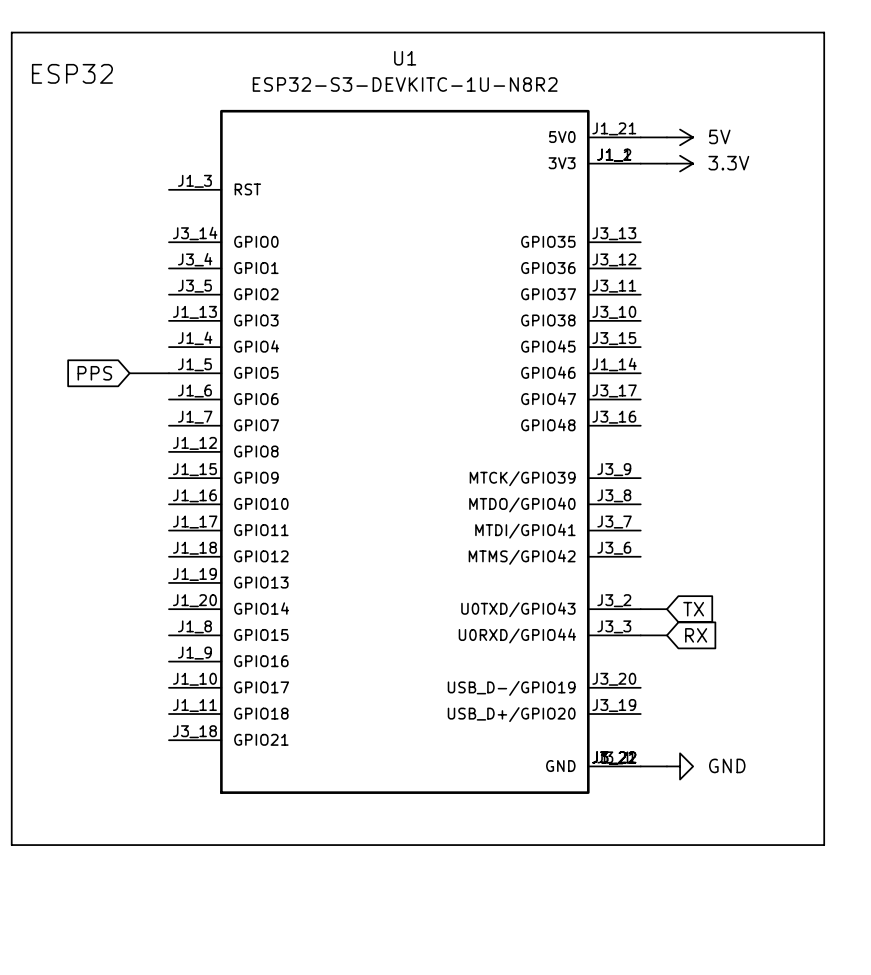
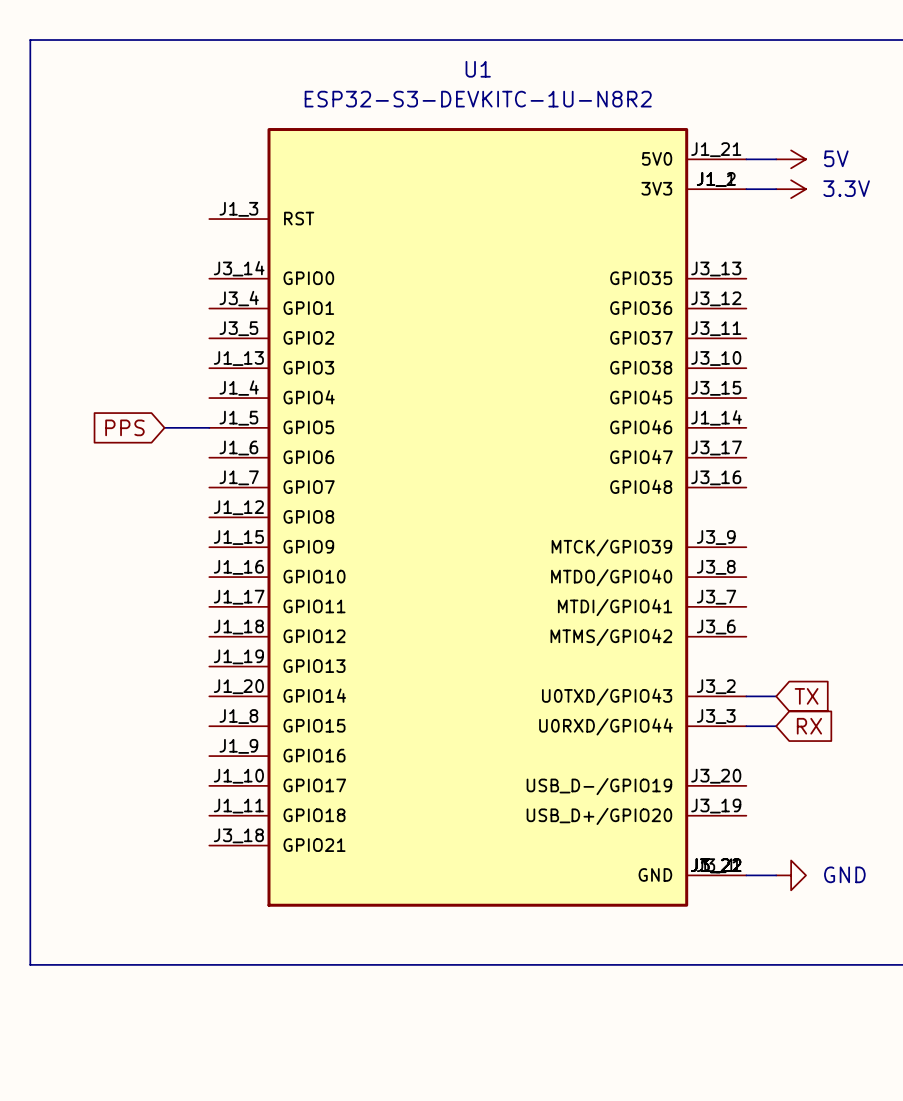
text: ESP32 (72, 73) -> none

